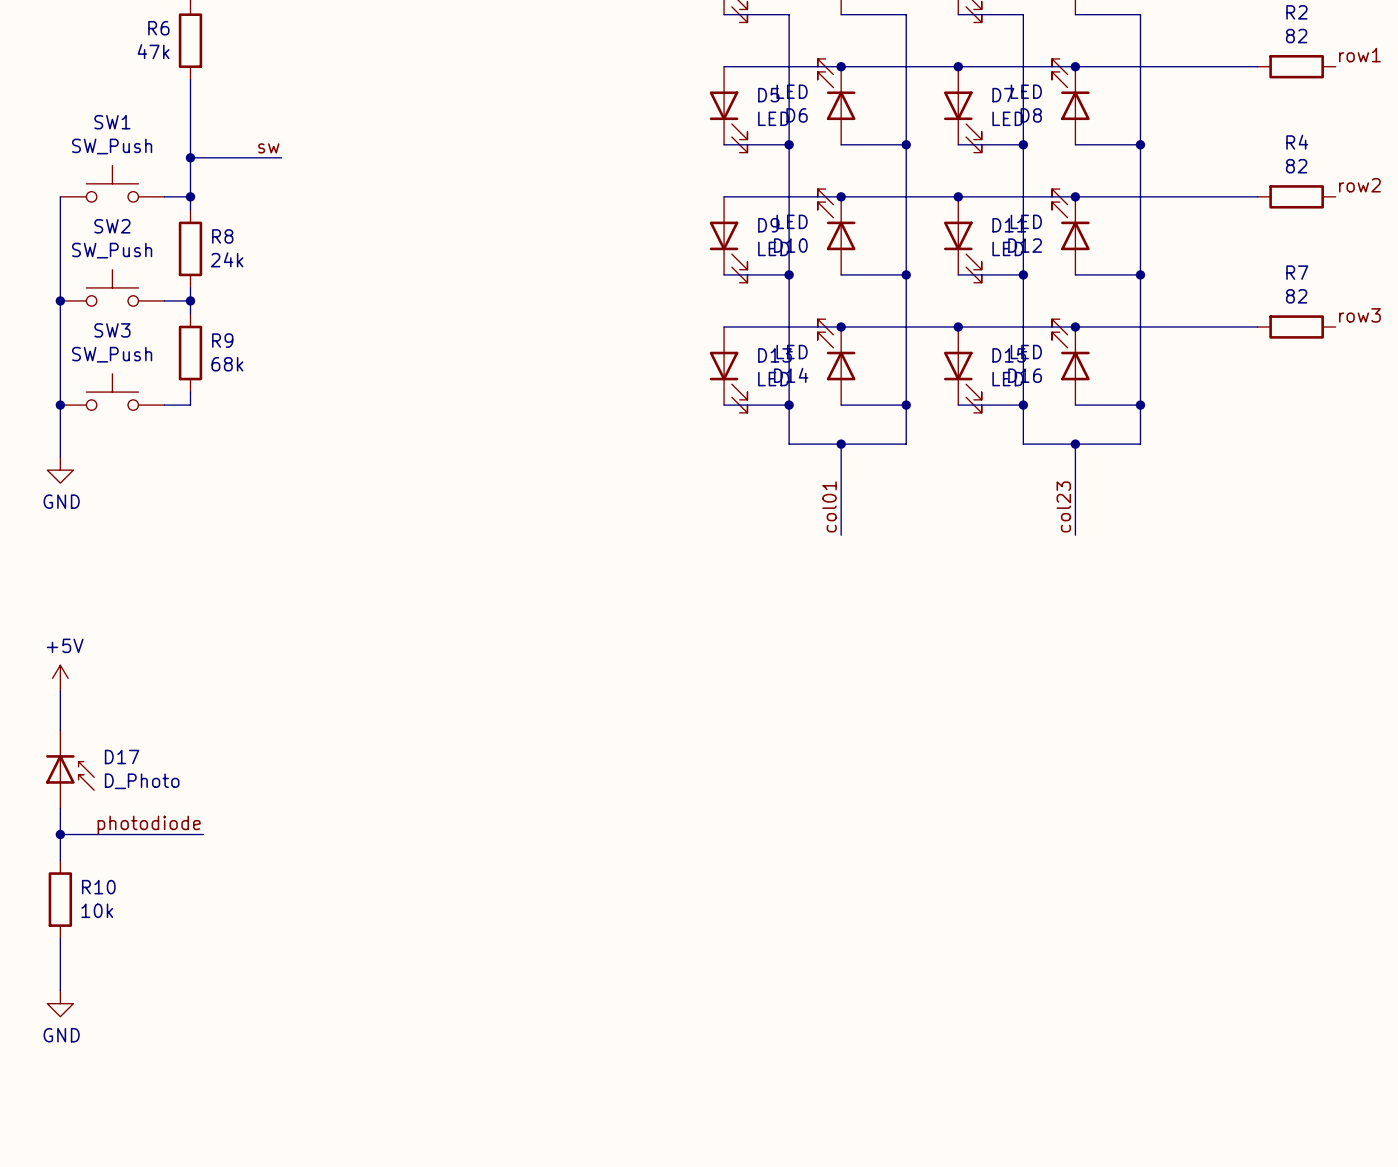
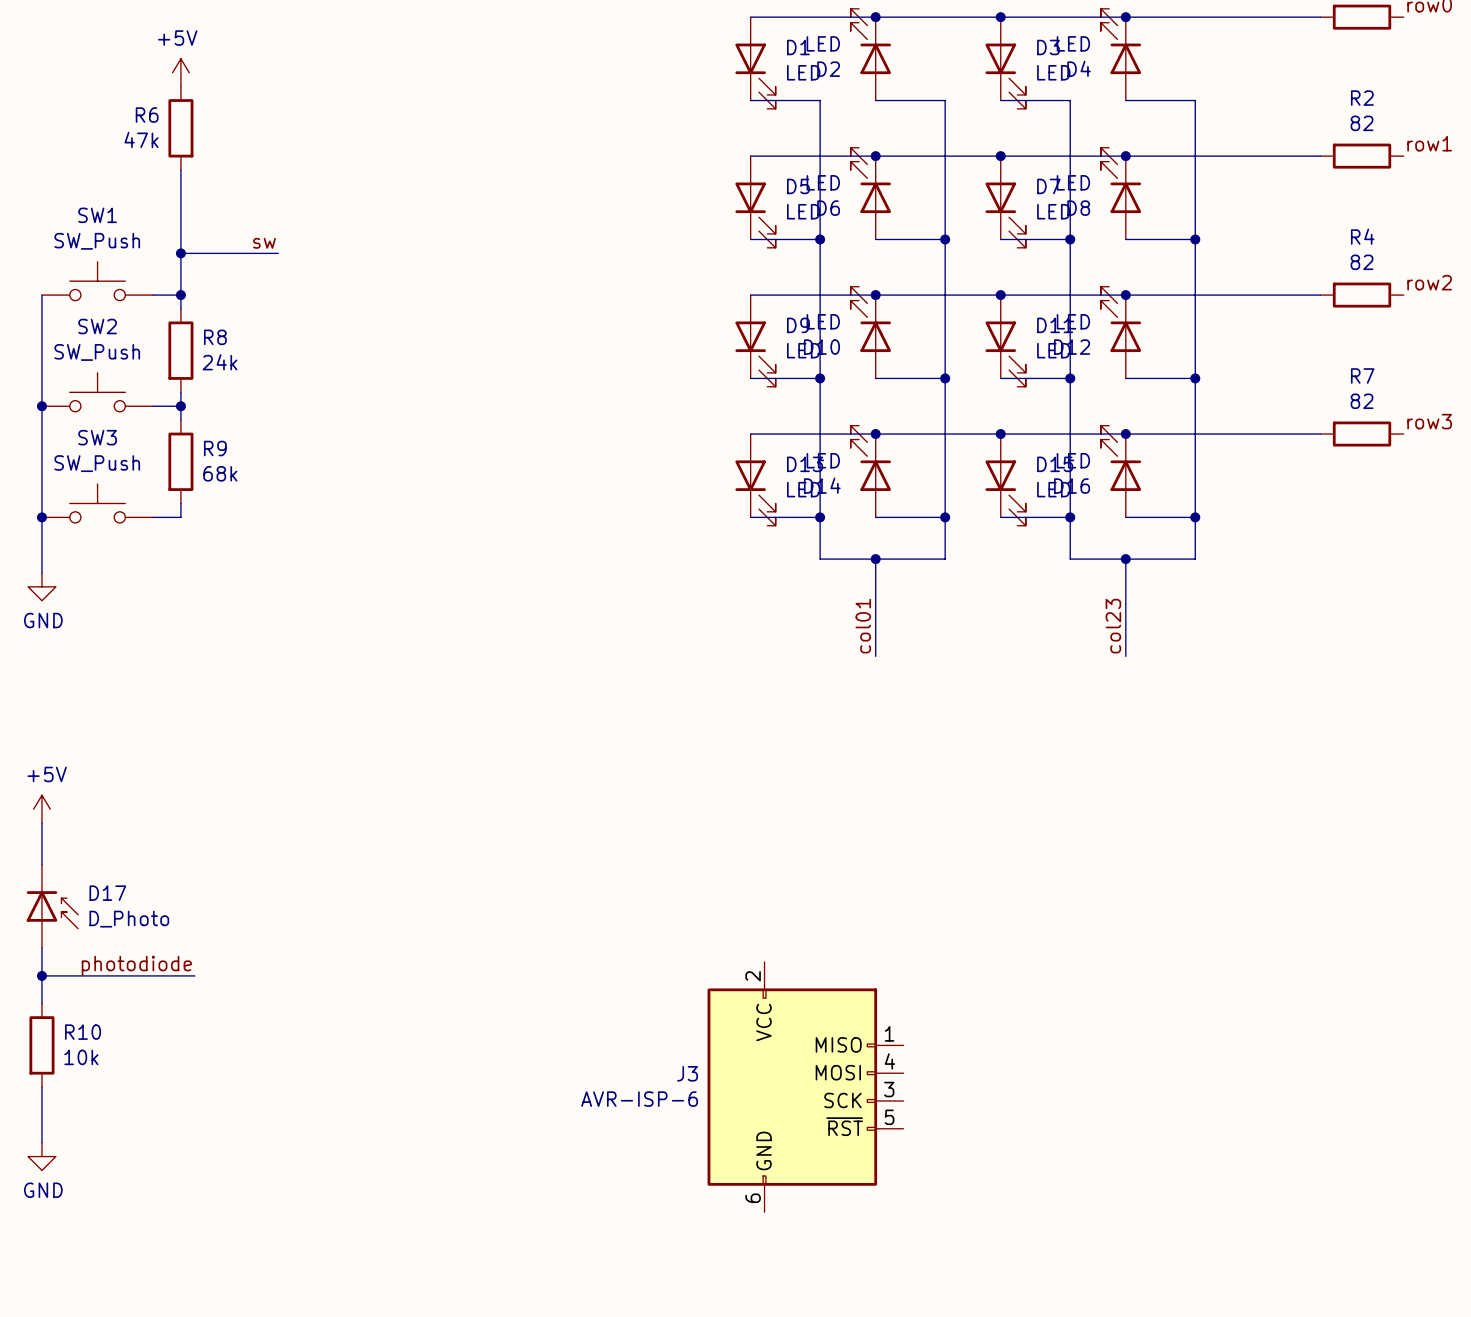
J3: none -> AVR-ISP-6 (805, 1087)

